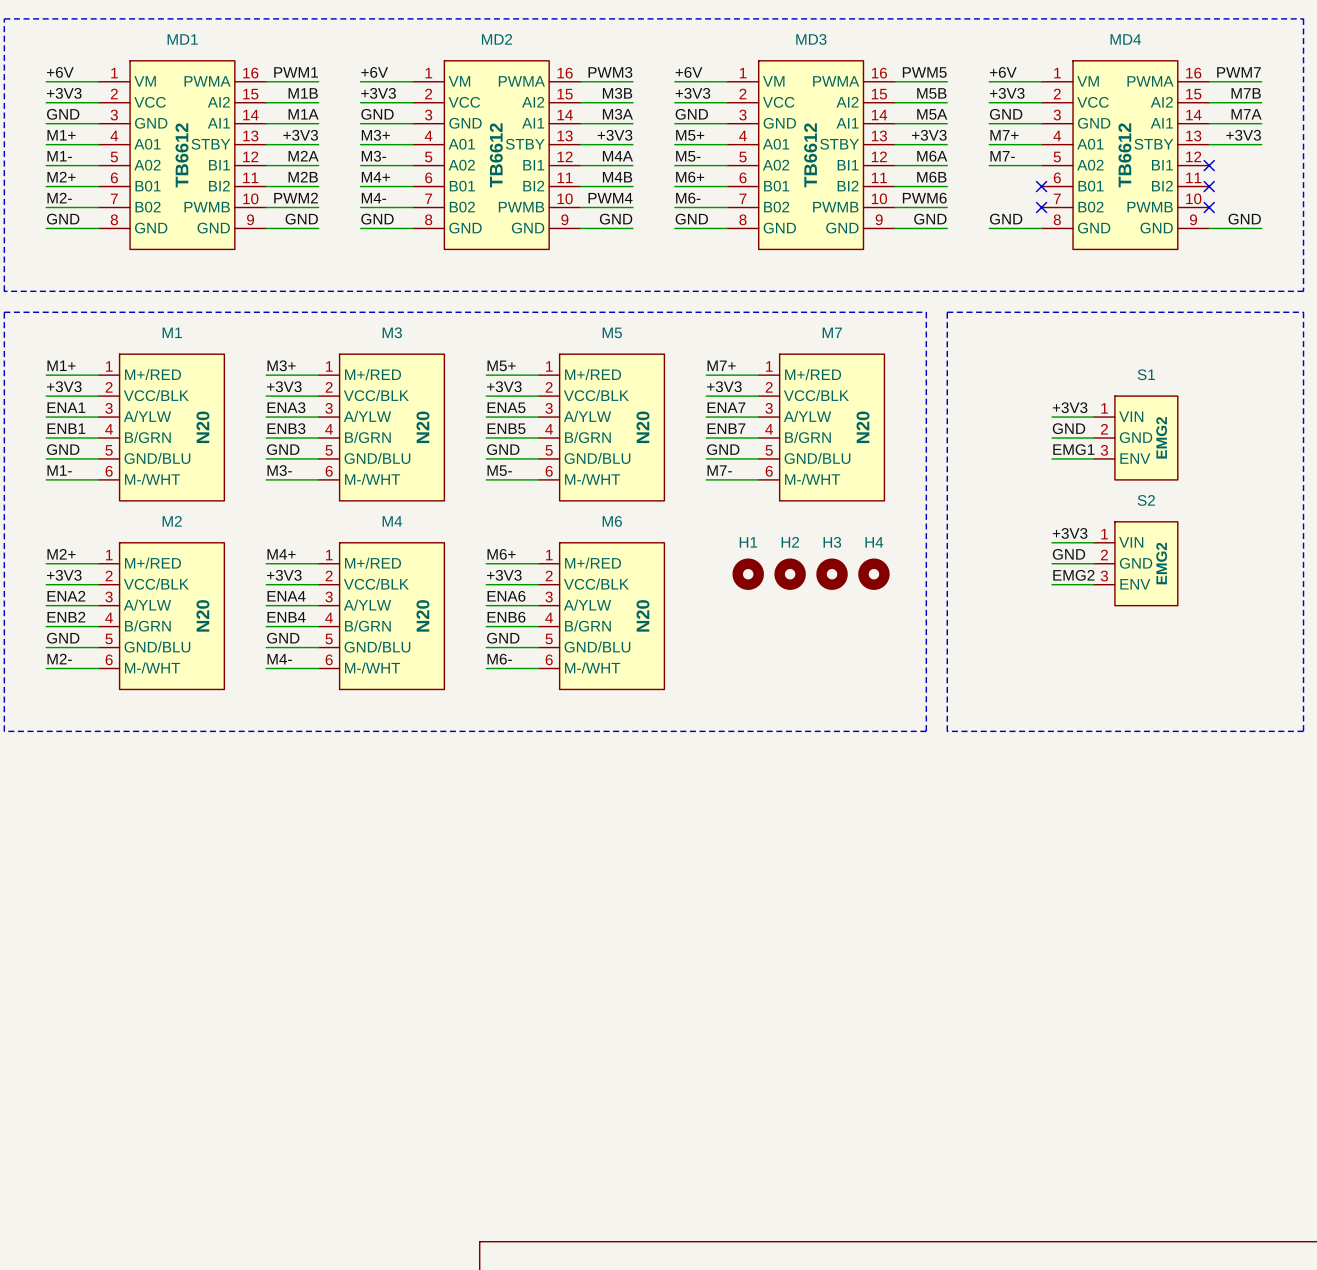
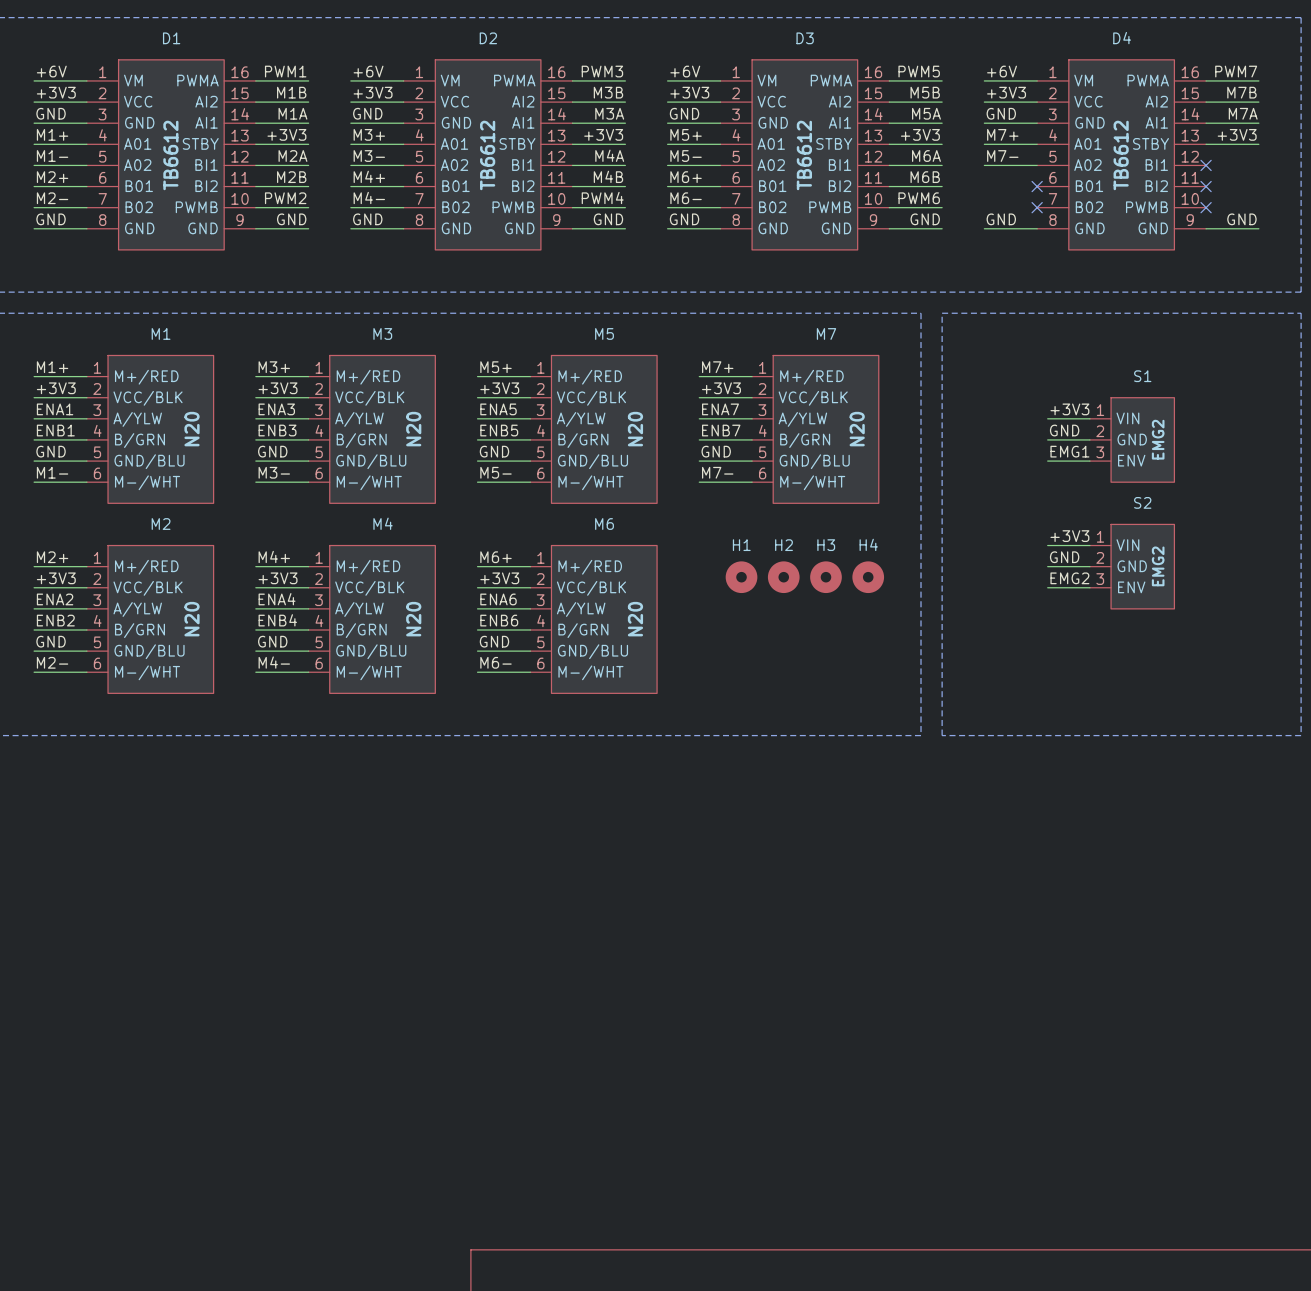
MD1 name: MD1 (182, 39) -> D1 (171, 38)
MD2 name: MD2 (497, 39) -> D2 (488, 38)
MD3 name: MD3 (811, 39) -> D3 (805, 38)
MD4 name: MD4 (1125, 39) -> D4 (1122, 38)

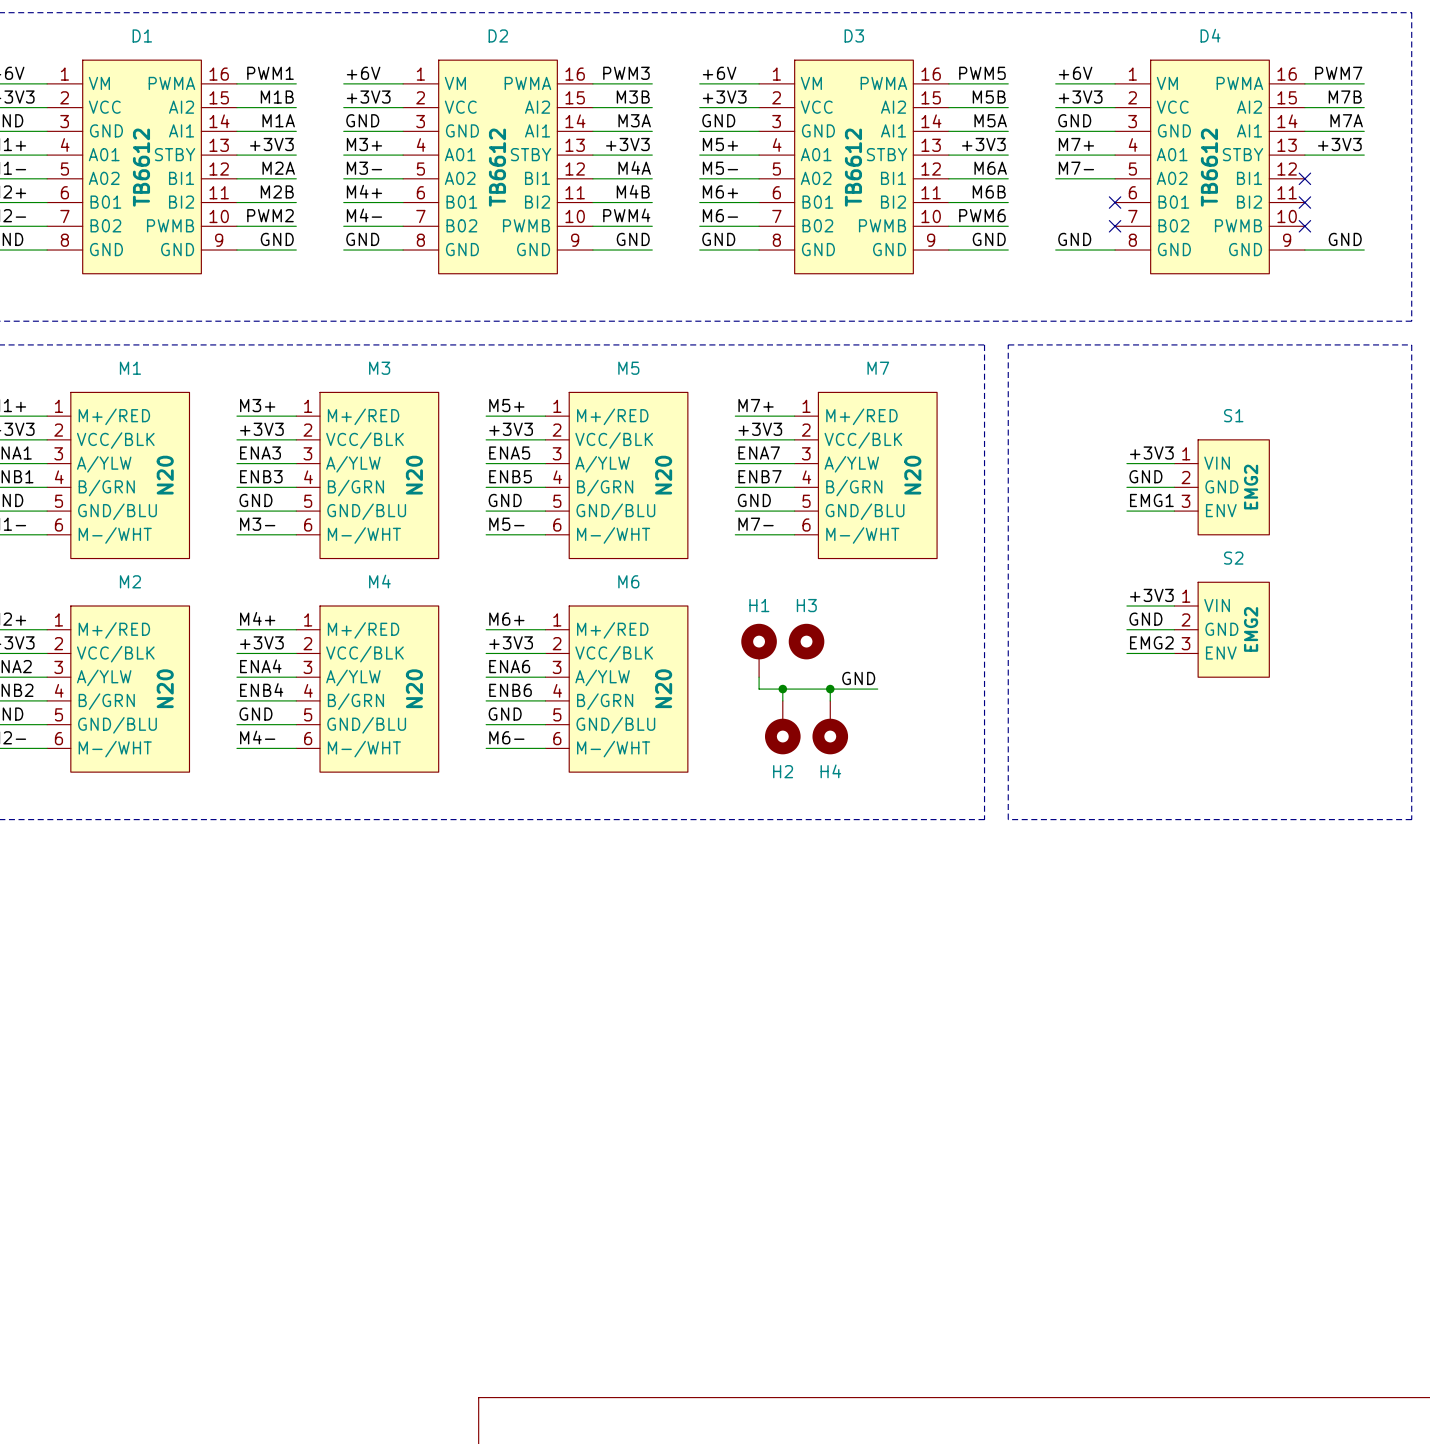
H4 name position: H4 (868, 544) -> H4 (830, 771)
H2 name position: H2 (784, 545) -> H2 (783, 771)
H1 symbol: [725, 561, 758, 594] -> [741, 623, 777, 678]
H2 symbol: [767, 561, 800, 594] -> [765, 700, 801, 755]
H4 symbol: [852, 561, 885, 594] -> [812, 700, 849, 755]
H3 position: (825, 577) -> (806, 641)
wire: none -> (759, 677) (759, 689) (877, 689)
label: none -> GND (858, 678)
wire: none -> (782, 689) (782, 700)
junction: none -> (782, 689)
wire: none -> (830, 689) (830, 700)
junction: none -> (830, 689)

